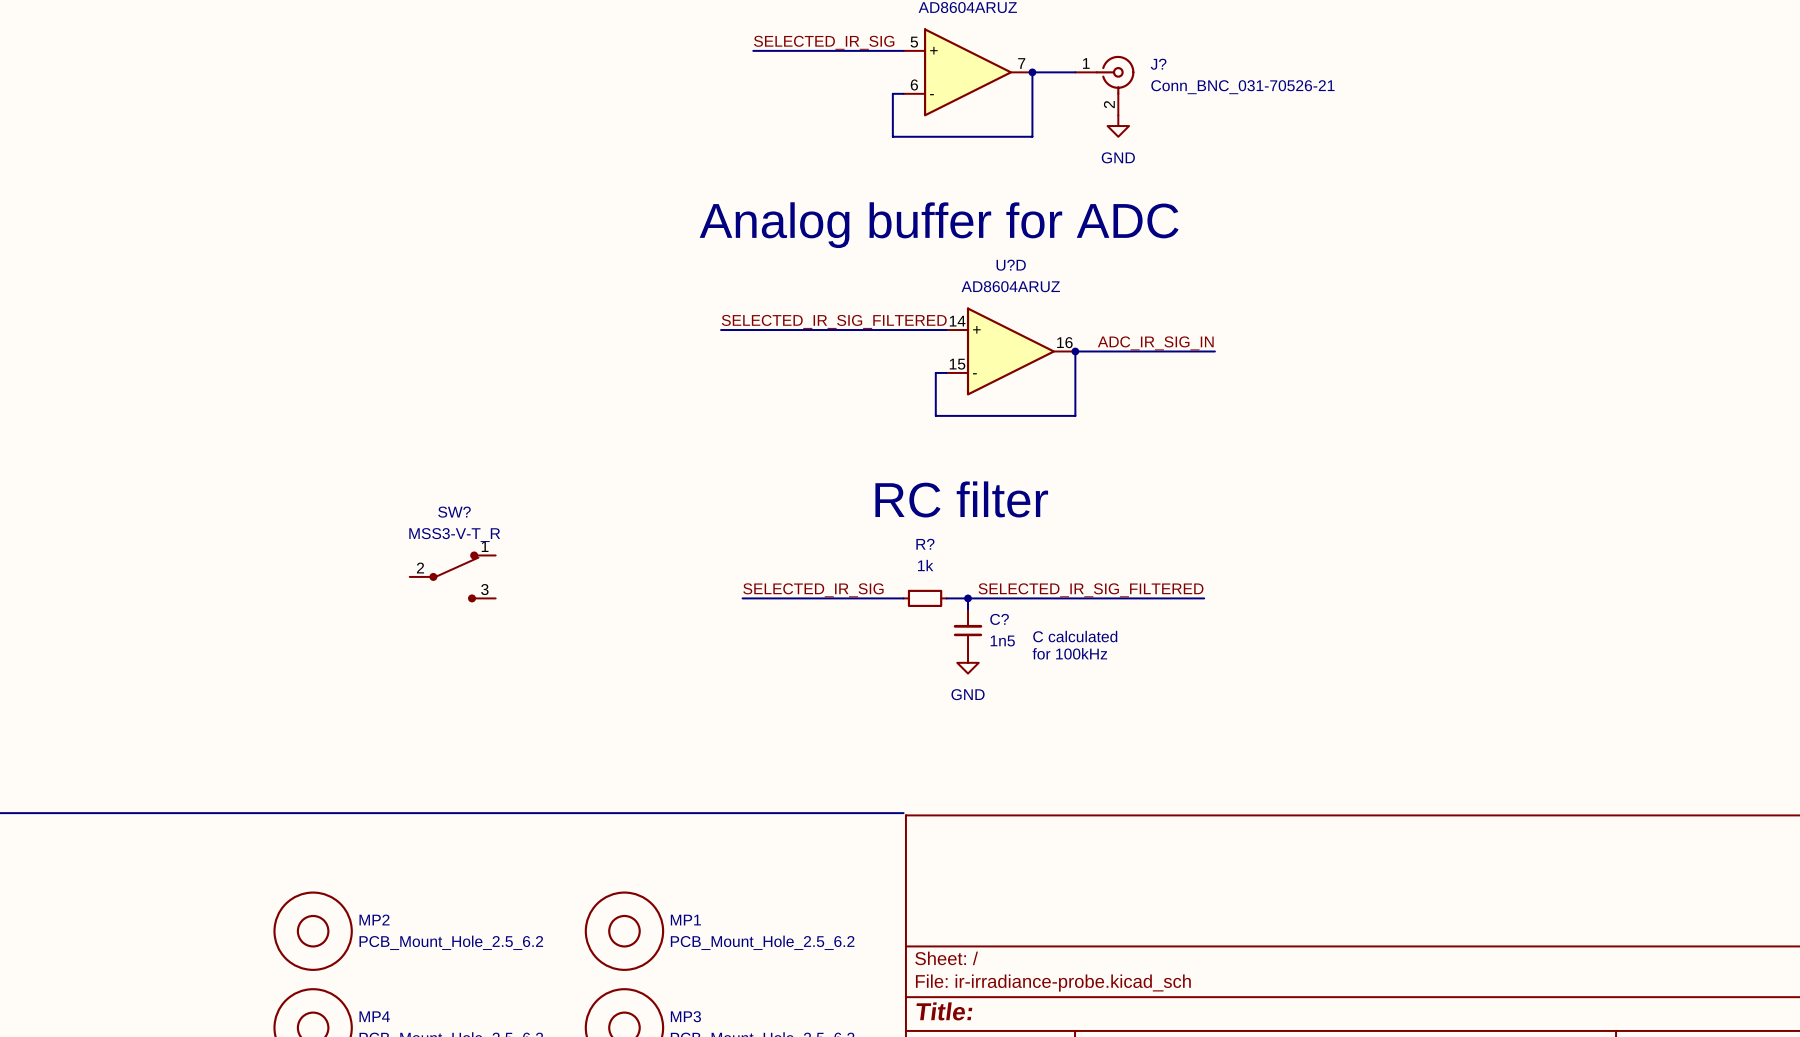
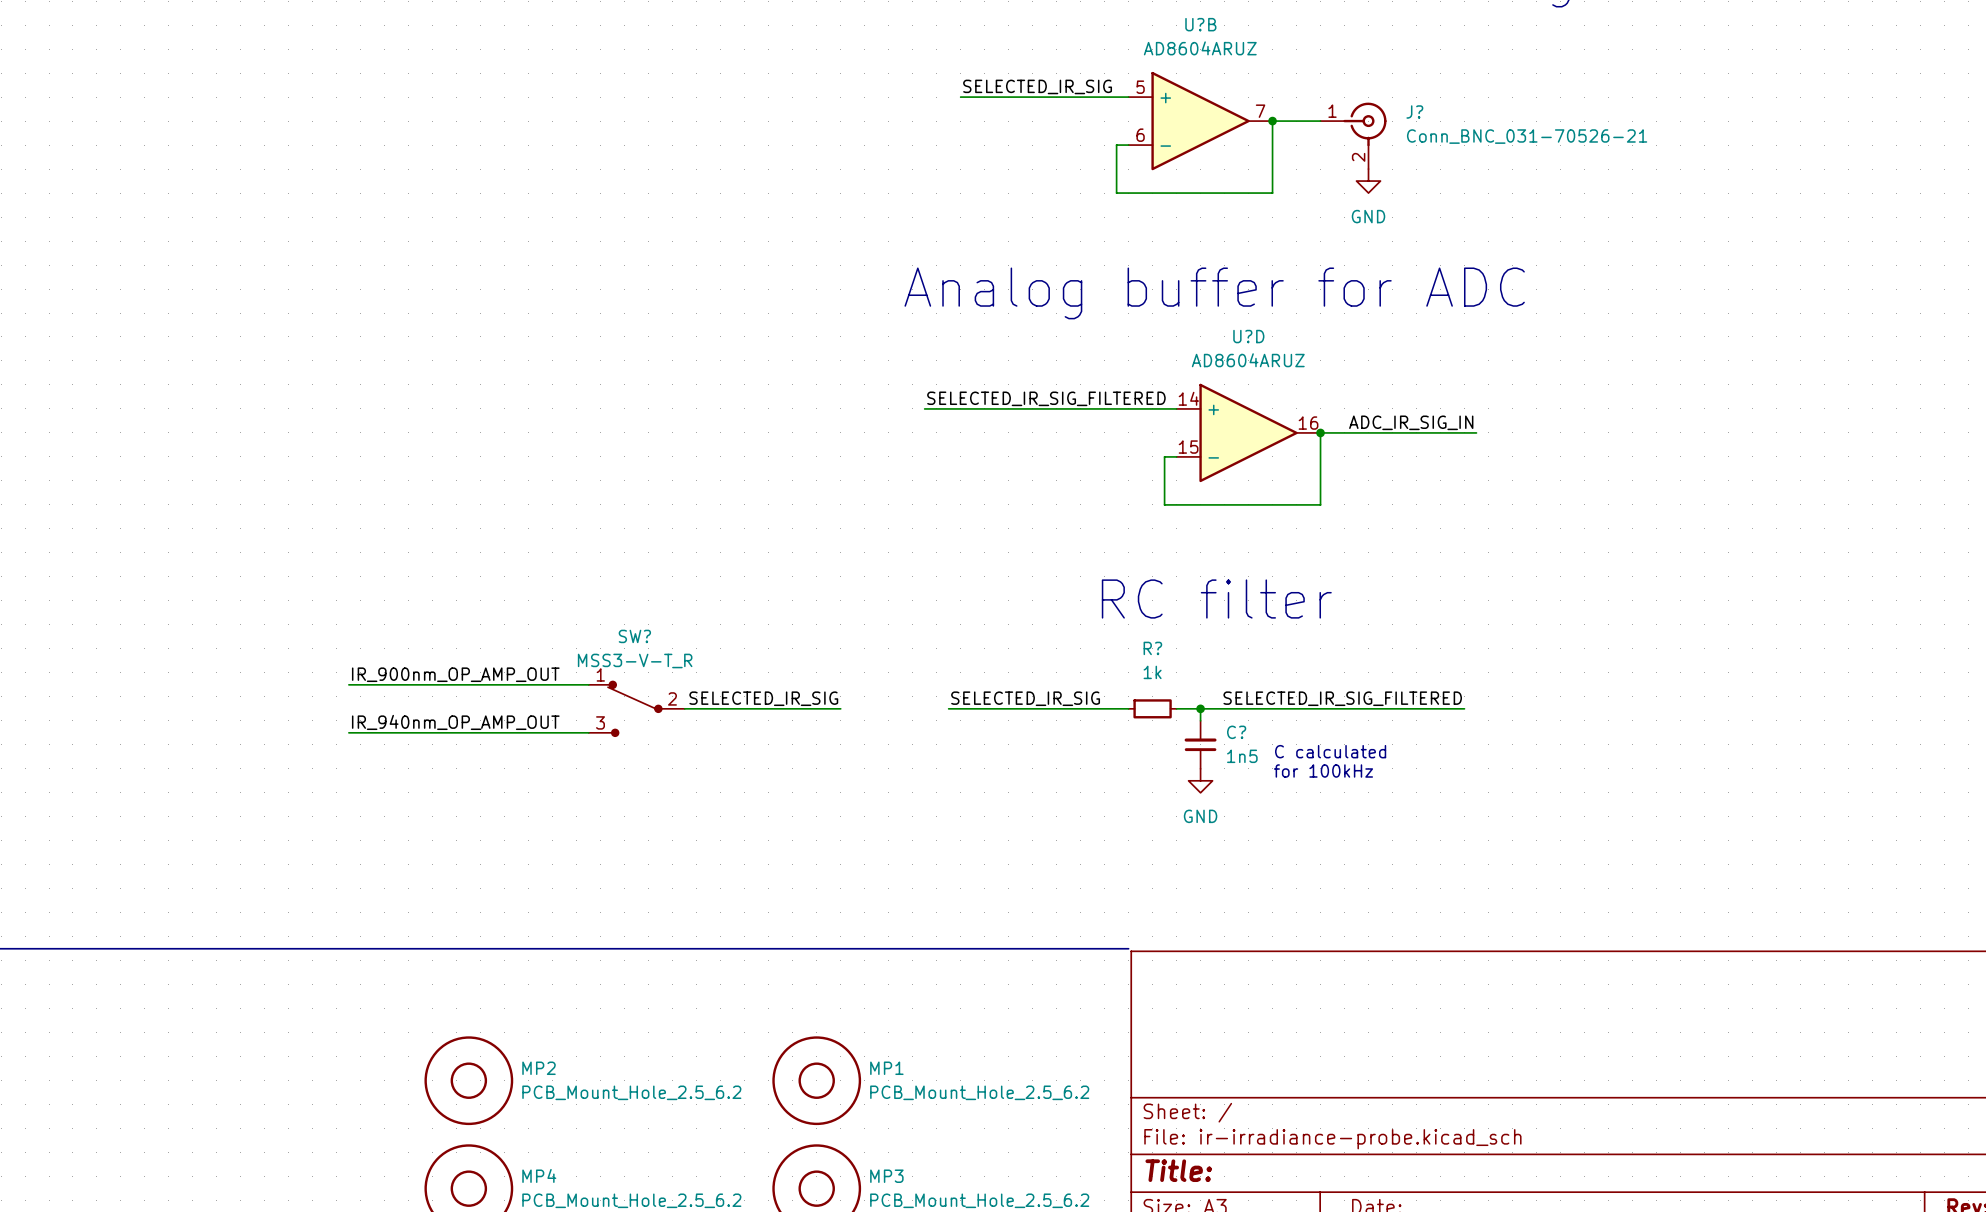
label: none -> IR_900nm_OP_AMP_OUT (455, 674)
wire: none -> (348, 684) (588, 684)
SW?: MSS3-V-T_R (452, 576) -> none
label: none -> SELECTED_IR_SIG (763, 698)
SW?: none -> MSS3-V-T_R (636, 708)
wire: none -> (684, 708) (840, 708)
label: none -> IR_940nm_OP_AMP_OUT (455, 722)
wire: none -> (348, 732) (588, 732)

